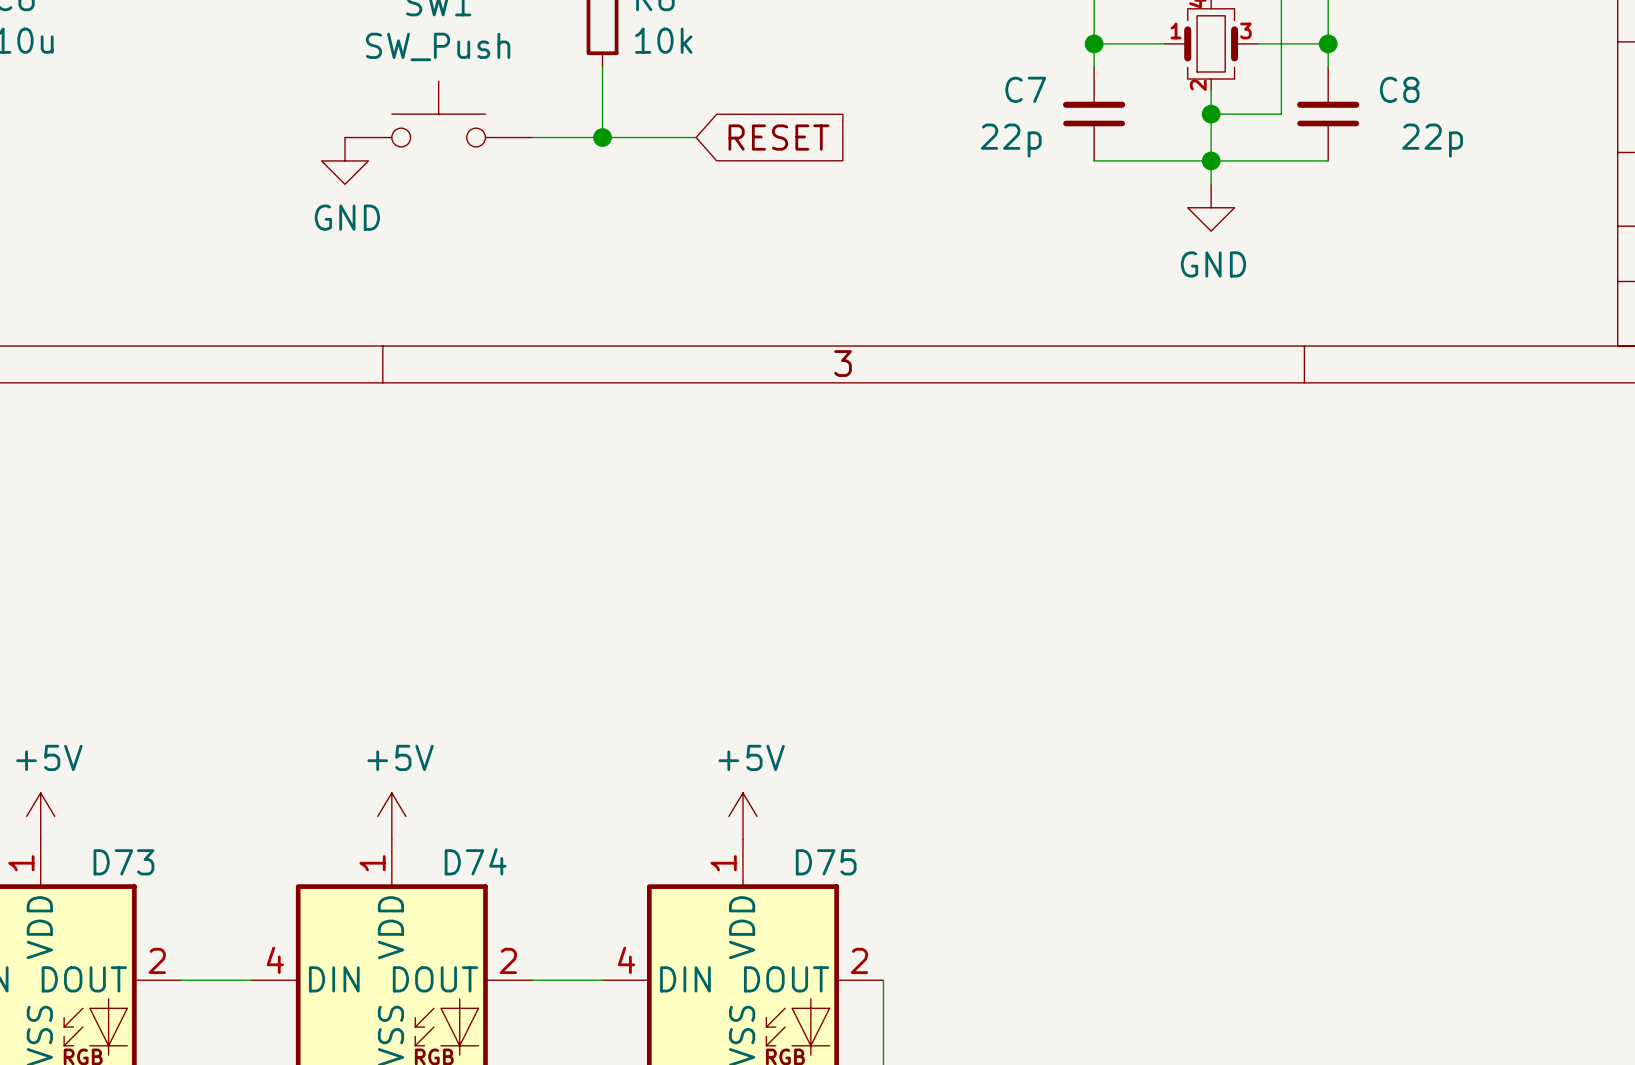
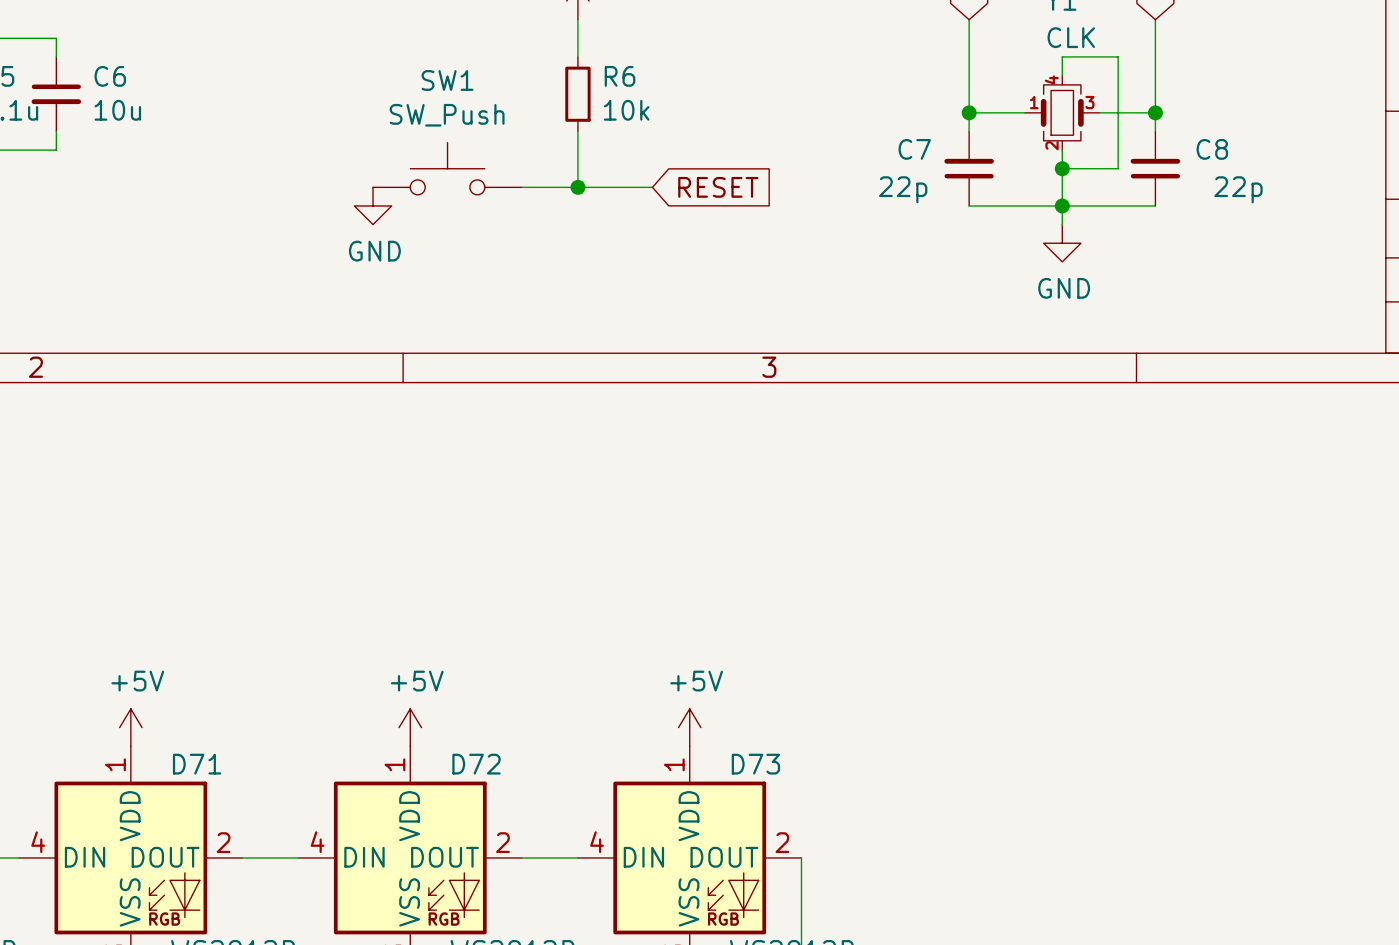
D74 name: D74 (475, 861) -> D72 (476, 764)
D73 name: D73 (123, 862) -> D71 (197, 764)
D75 name: D75 (826, 862) -> D73 (755, 764)

